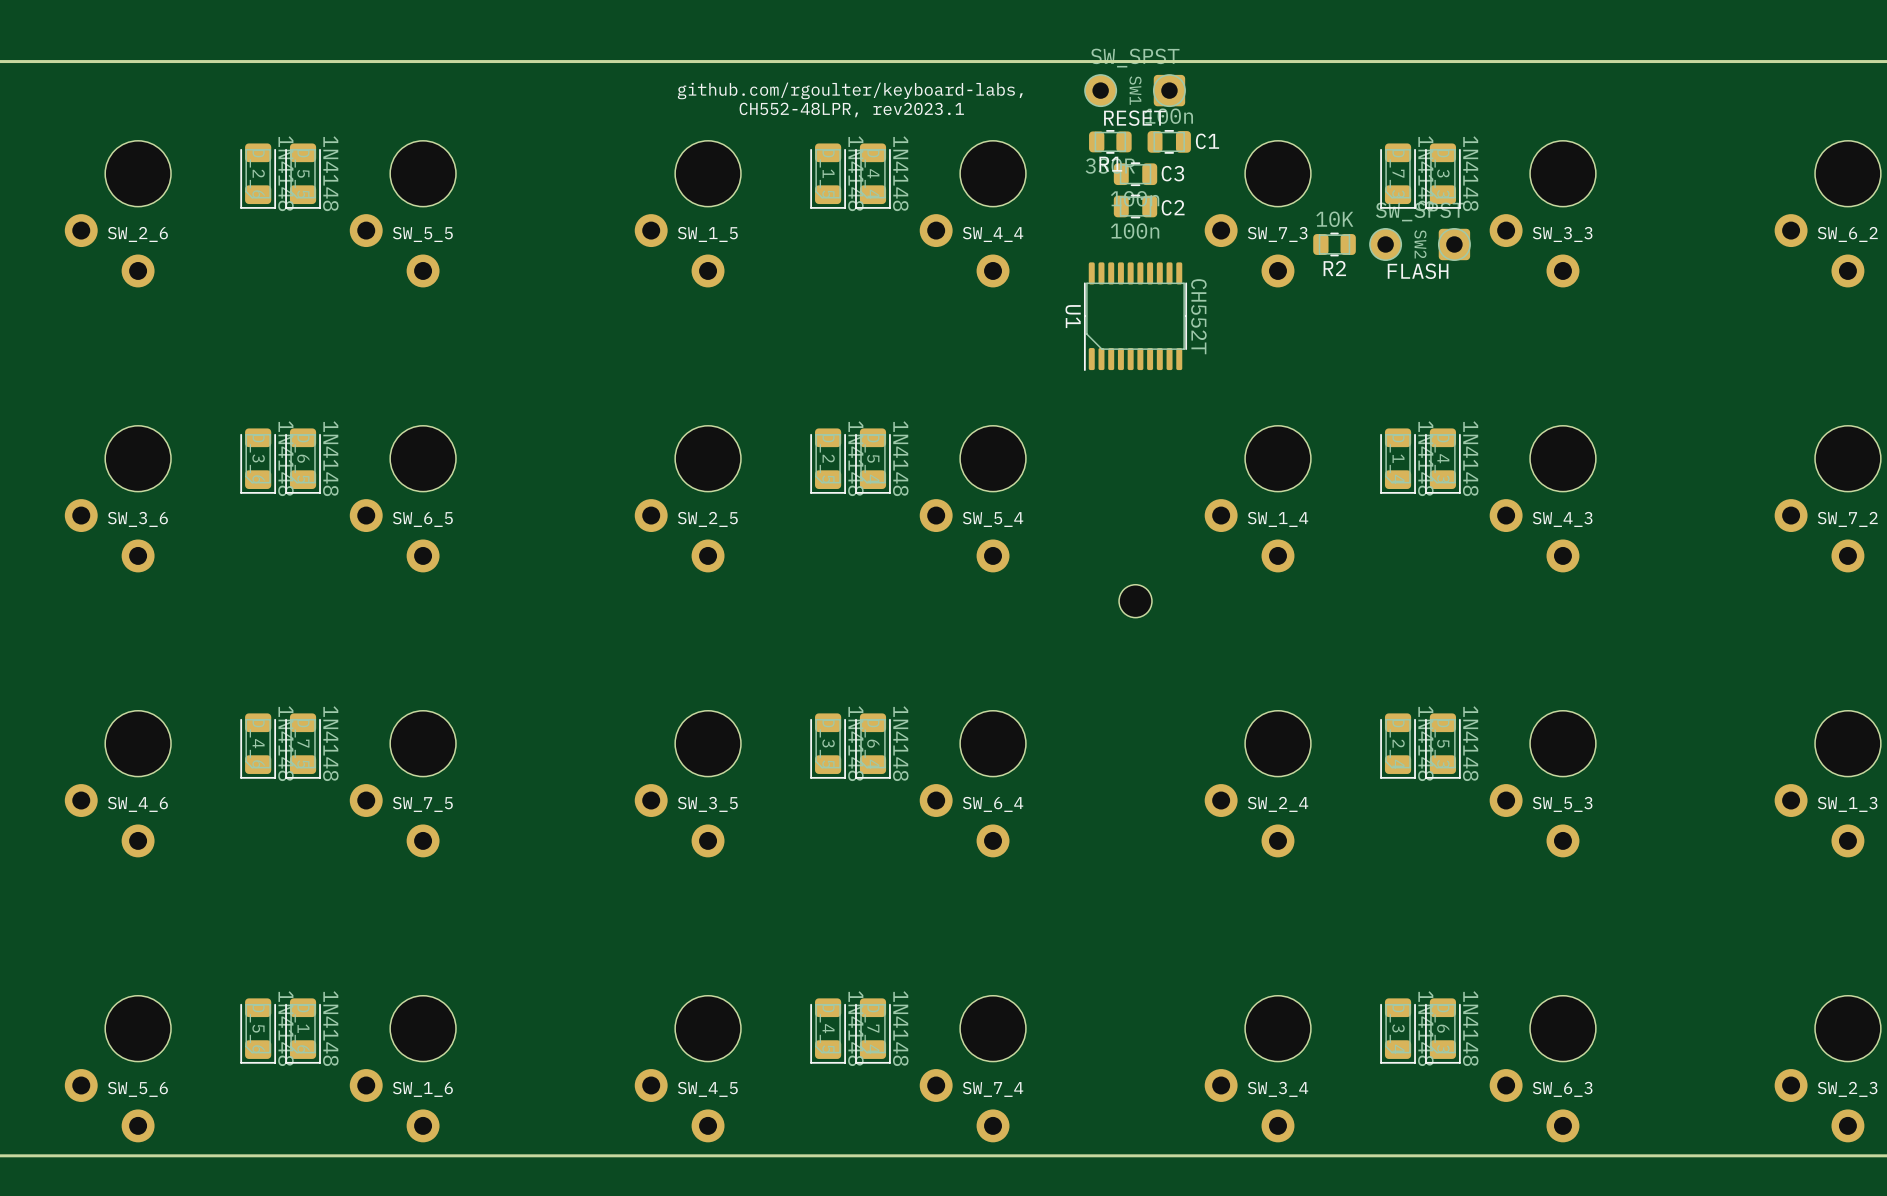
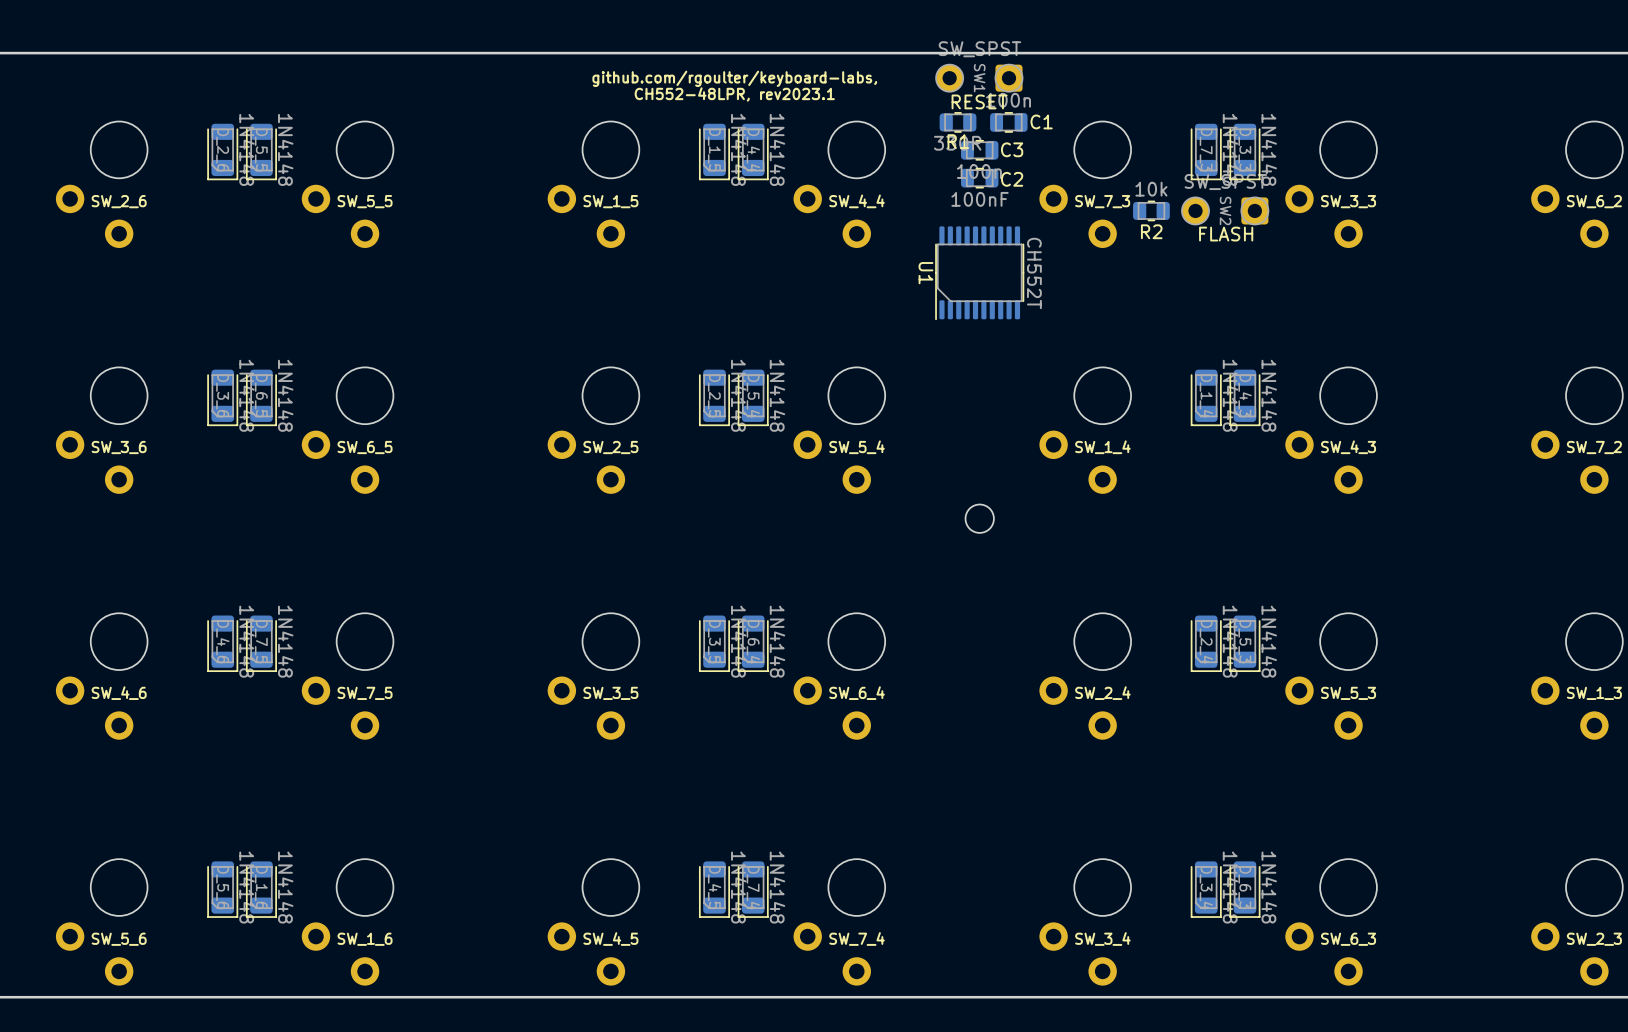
R2 value: 10K (1334, 219) -> 10k (1151, 189)
C2 value: 100n (1135, 231) -> 100nF (980, 199)

